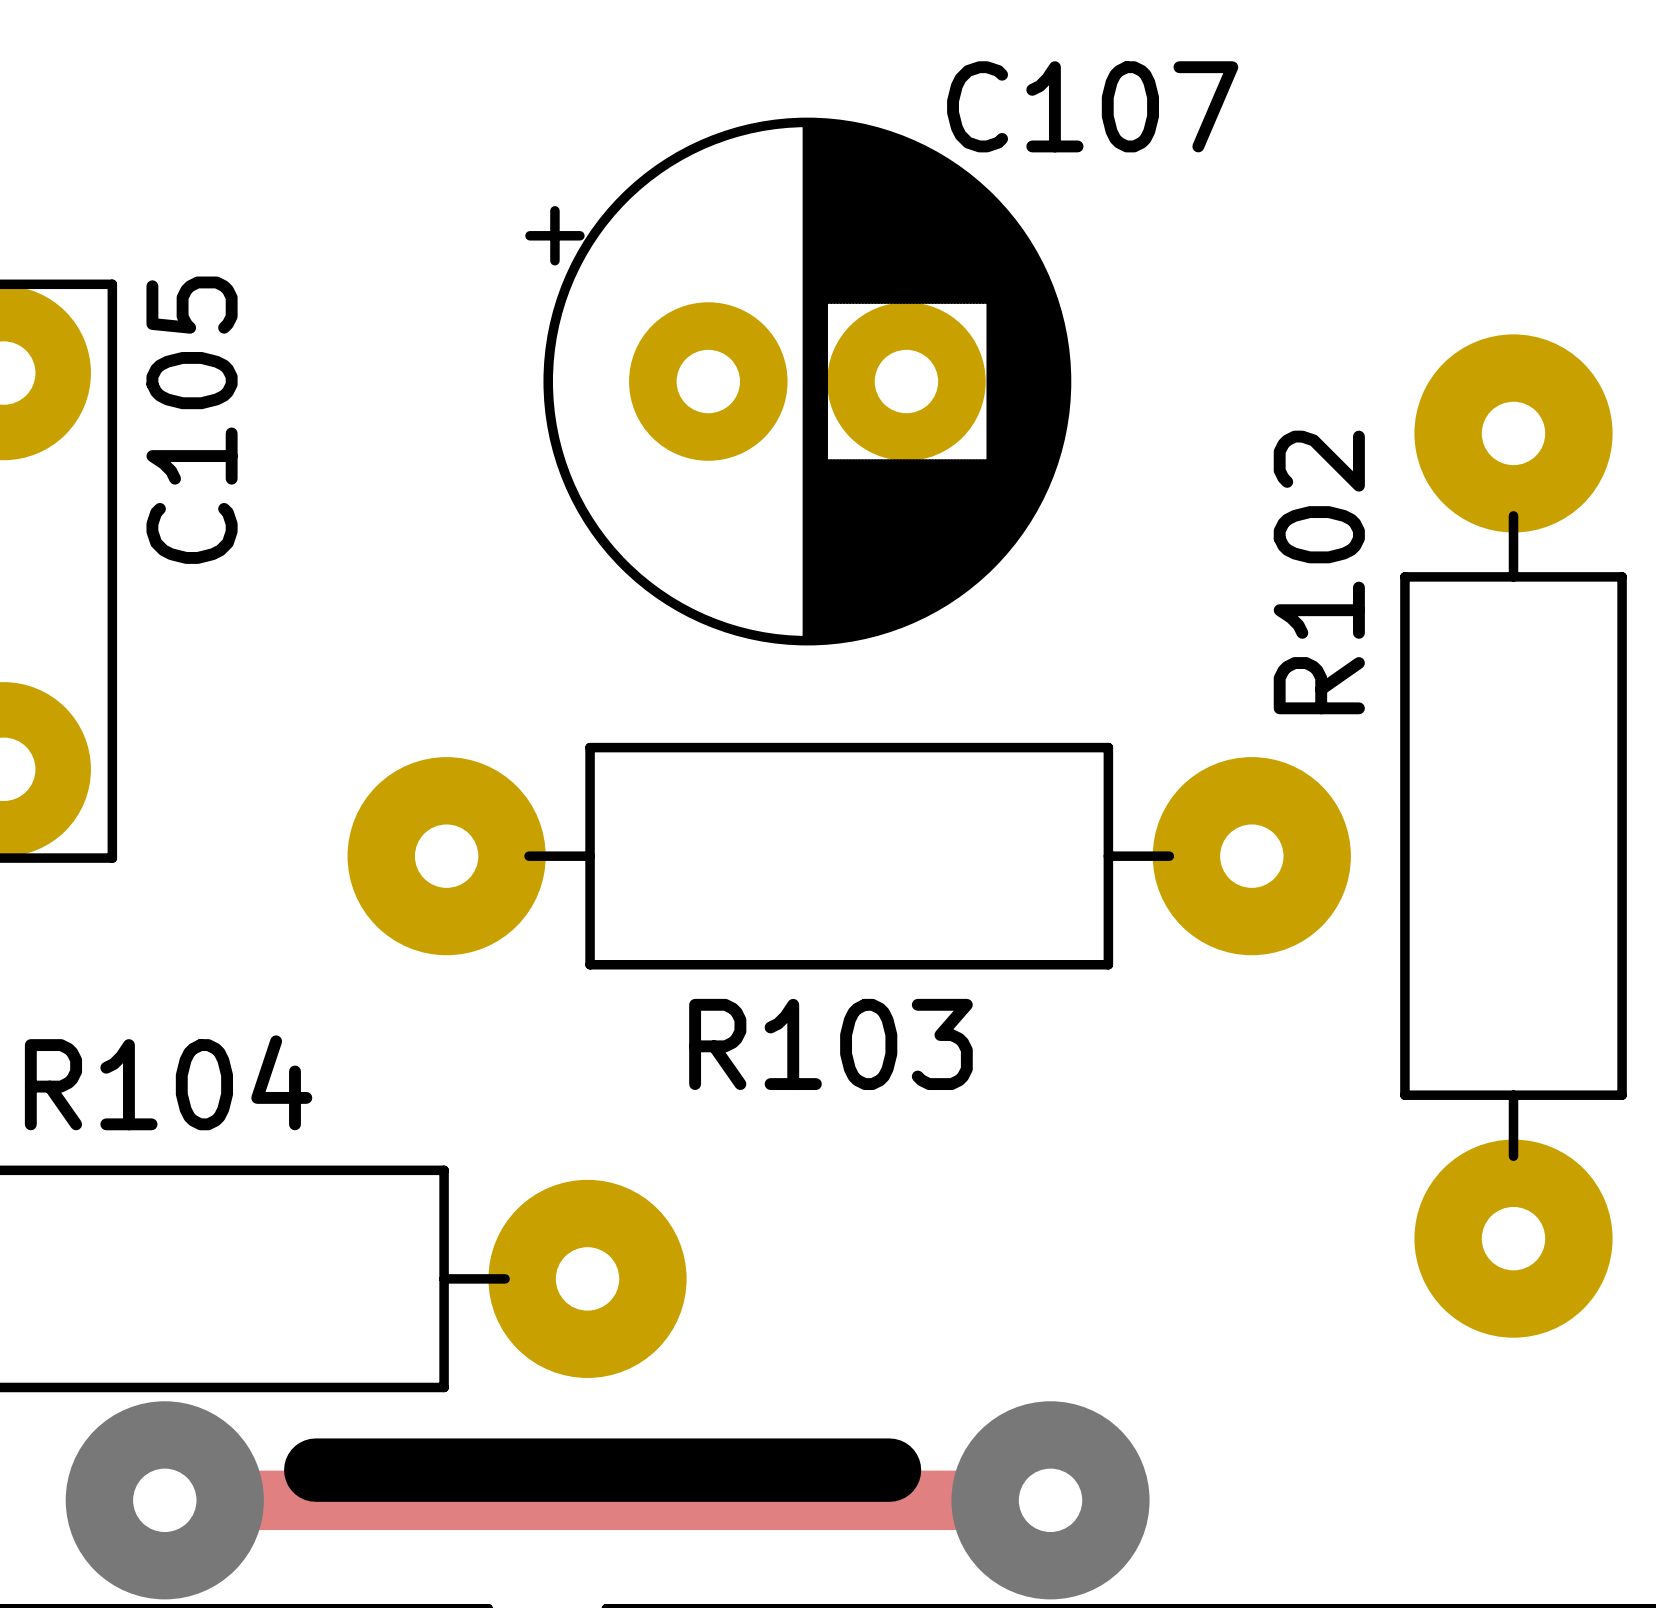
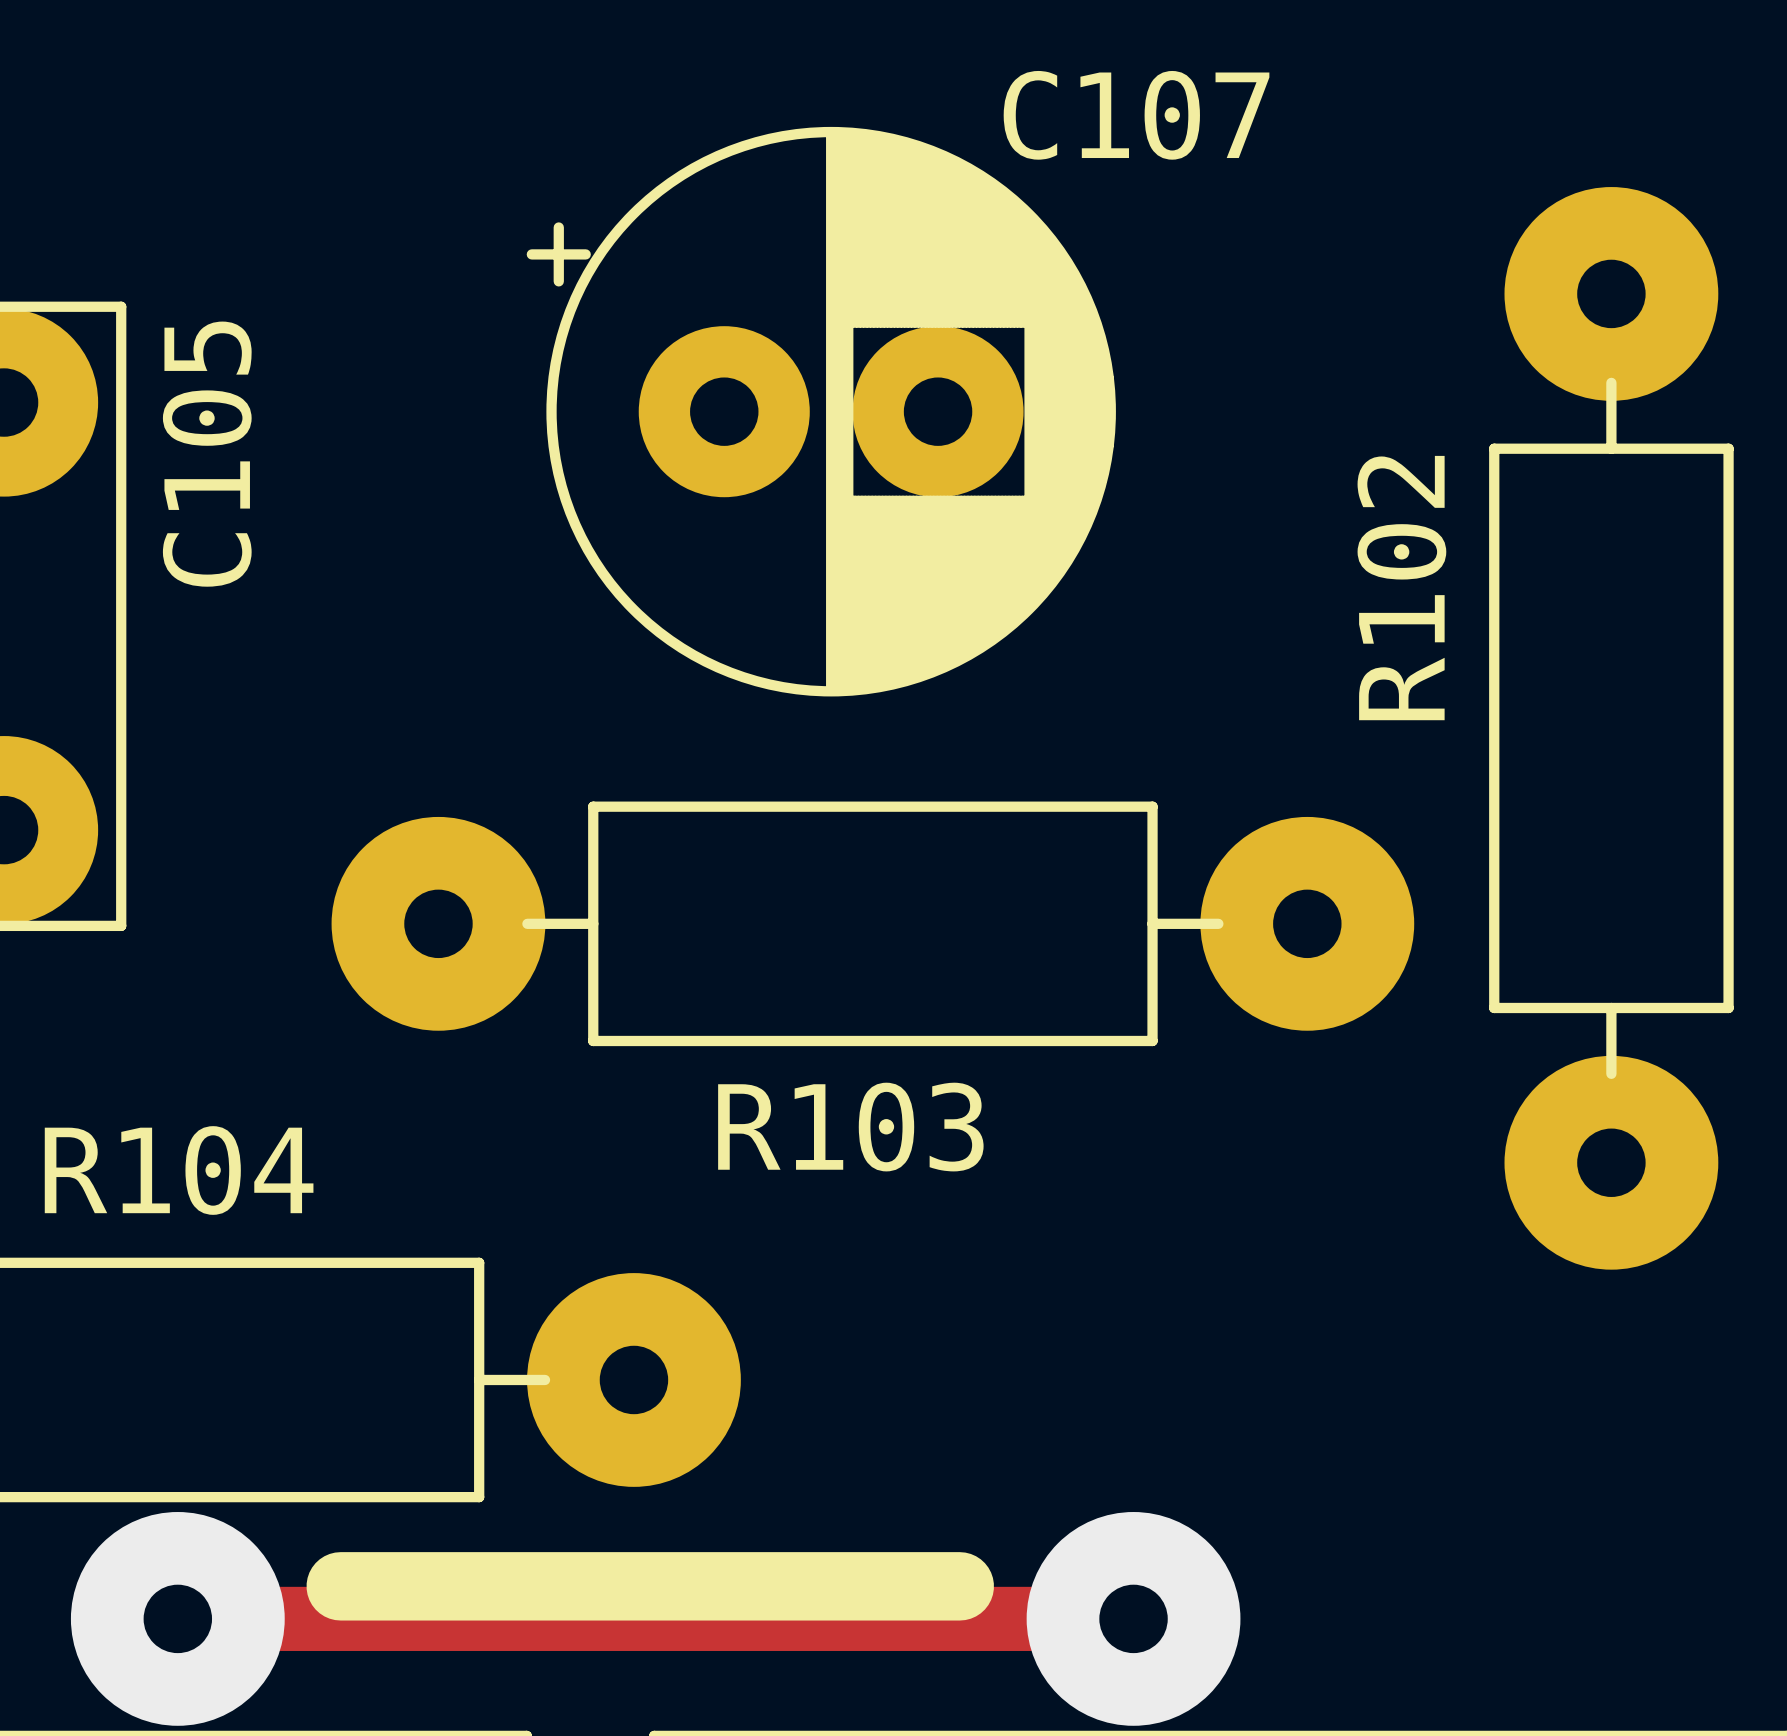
C107 position: (798, 381) -> (821, 411)
R102 name position: R102 (1319, 572) -> R102 (1401, 588)
R102 position: (1513, 836) -> (1611, 728)
R103 position: (849, 856) -> (872, 923)

